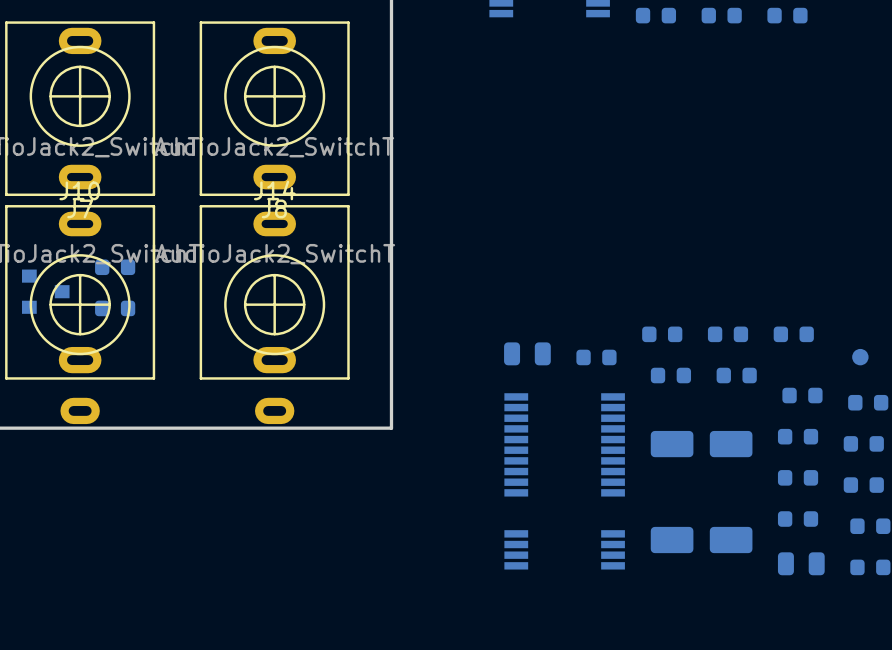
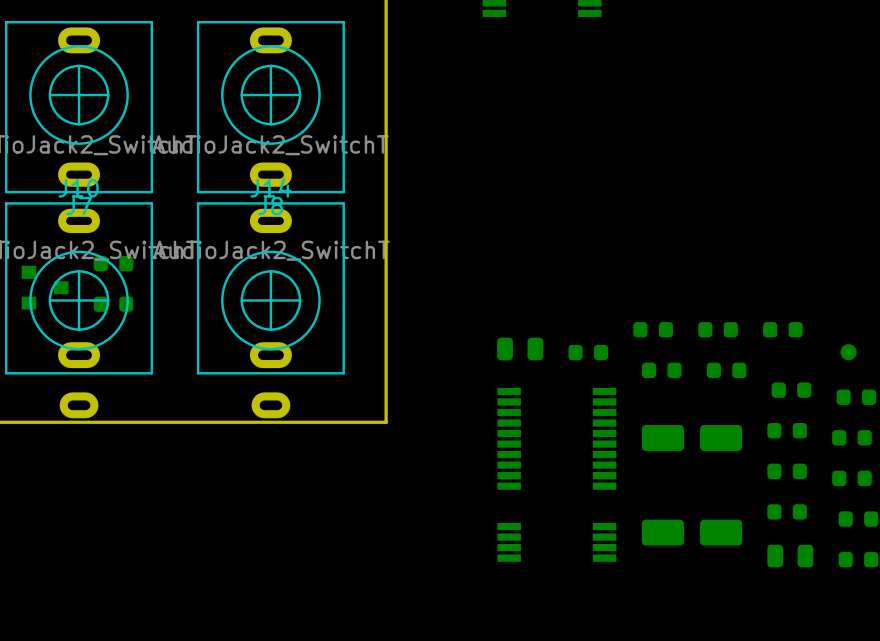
part: (655, 15) -> none
part: (721, 15) -> none
part: (787, 15) -> none

